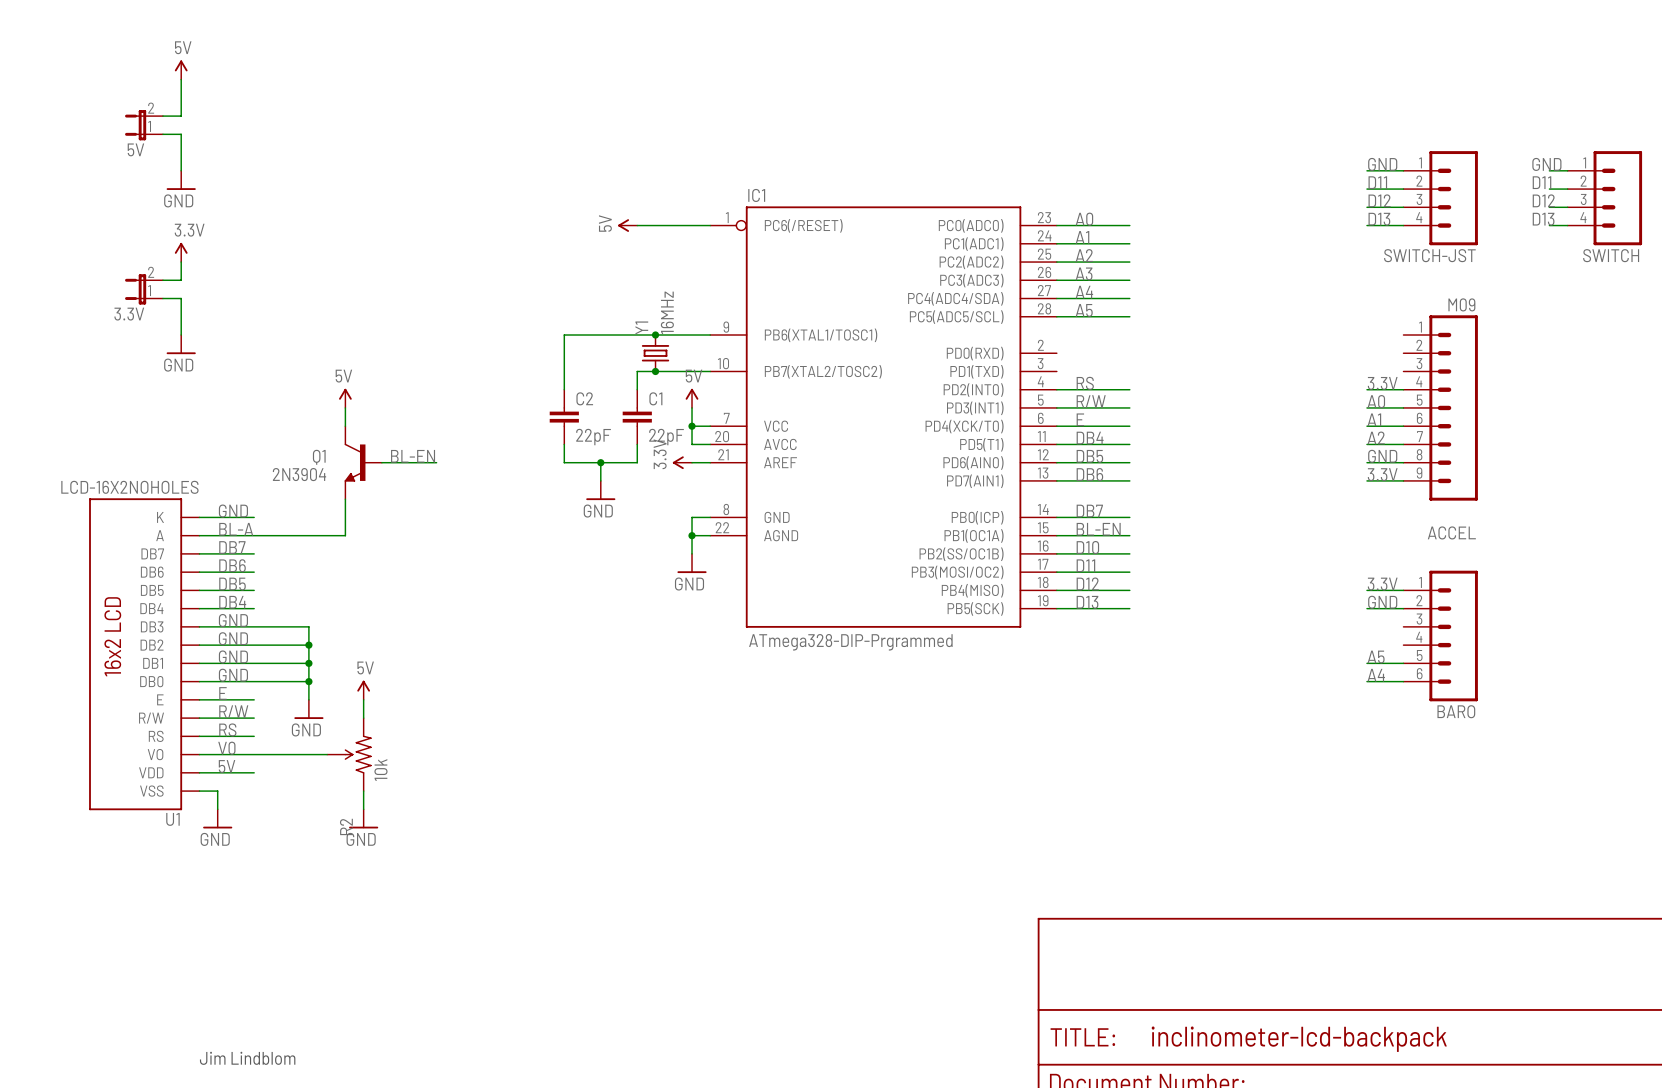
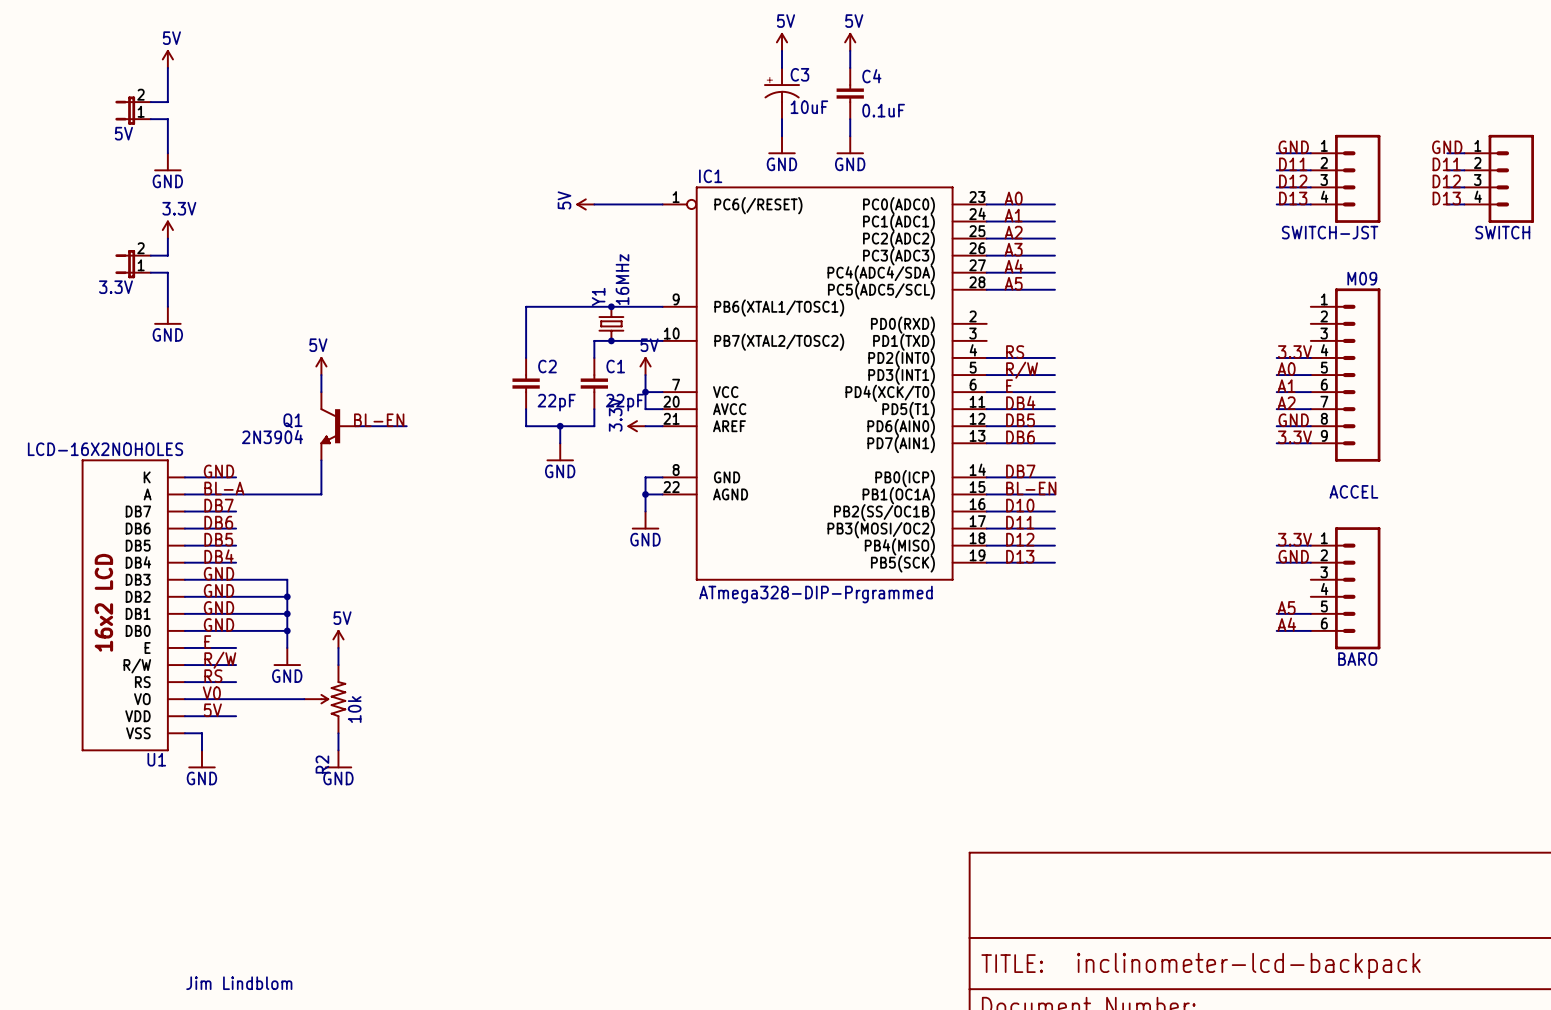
power symbol: none -> 5V (782, 41)
power symbol: none -> 5V (850, 41)
wire: none -> (782, 50) (782, 67)
wire: none -> (850, 50) (850, 67)
C3: none -> 10uF (782, 93)
C4: none -> 0.1uF (850, 93)
wire: none -> (782, 119) (782, 136)
wire: none -> (850, 119) (850, 136)
power symbol: none -> GND (782, 145)
power symbol: none -> GND (850, 145)

